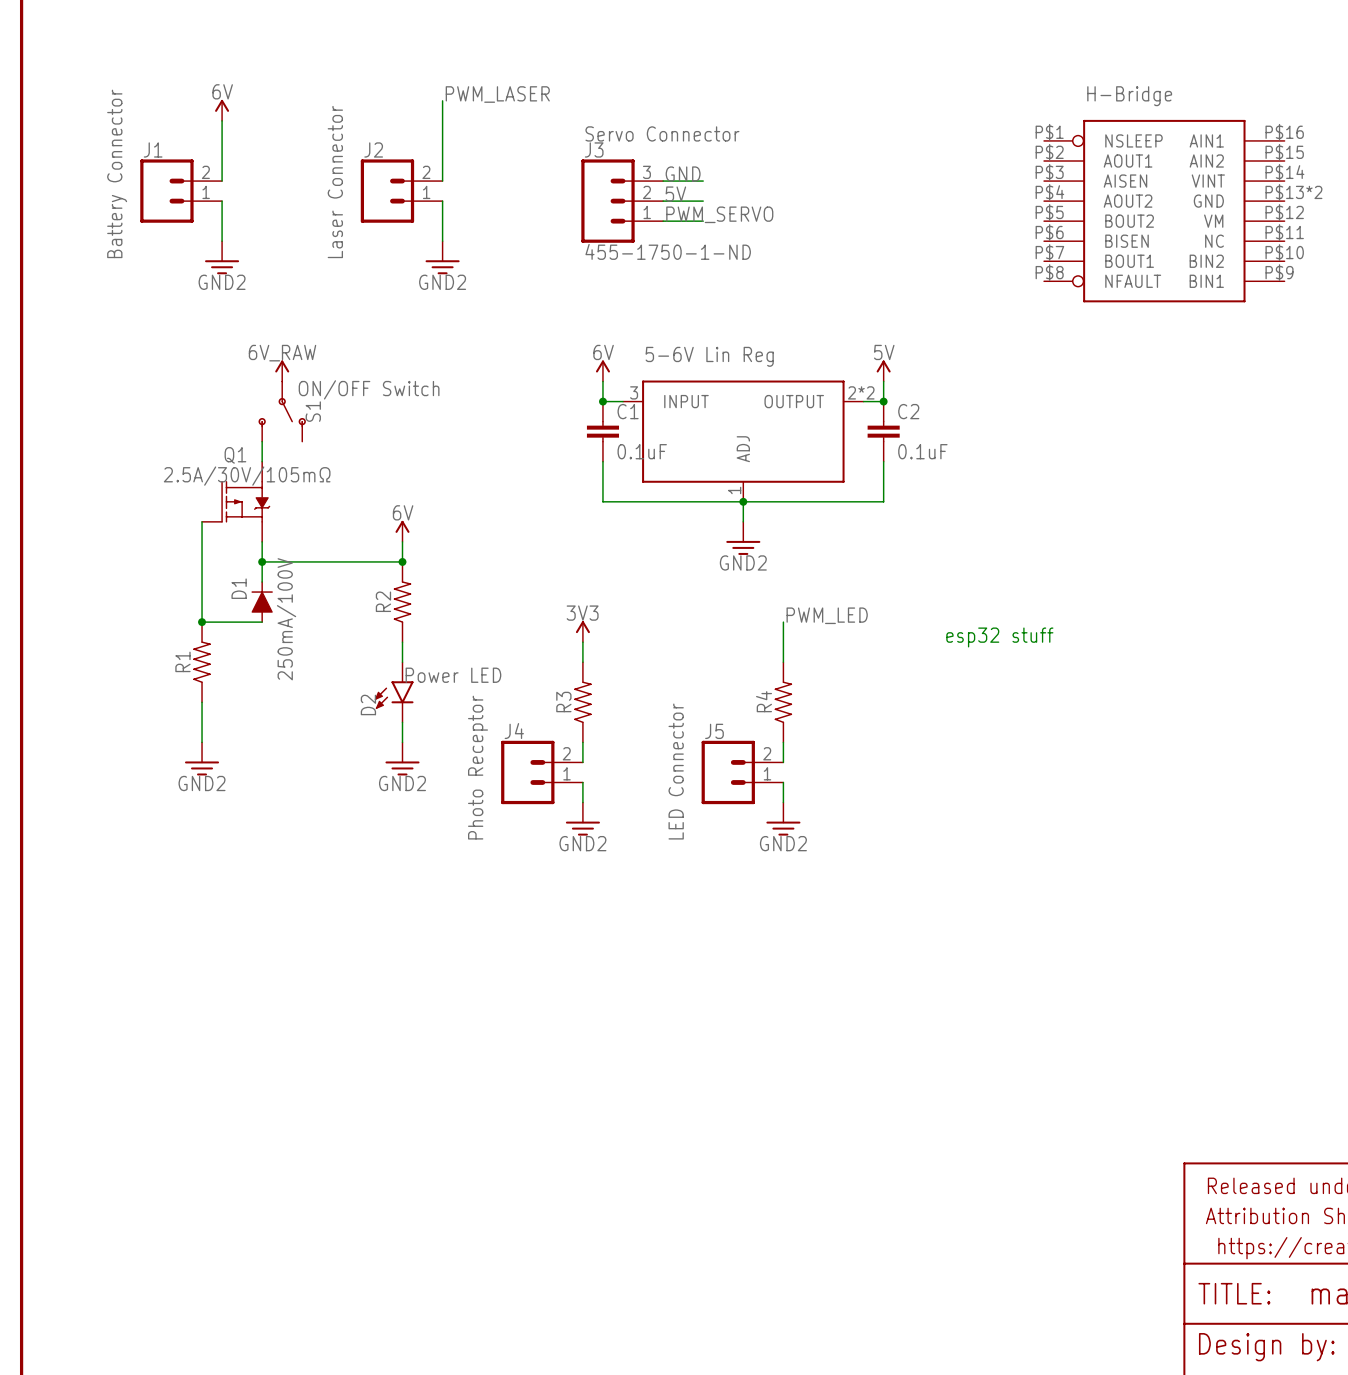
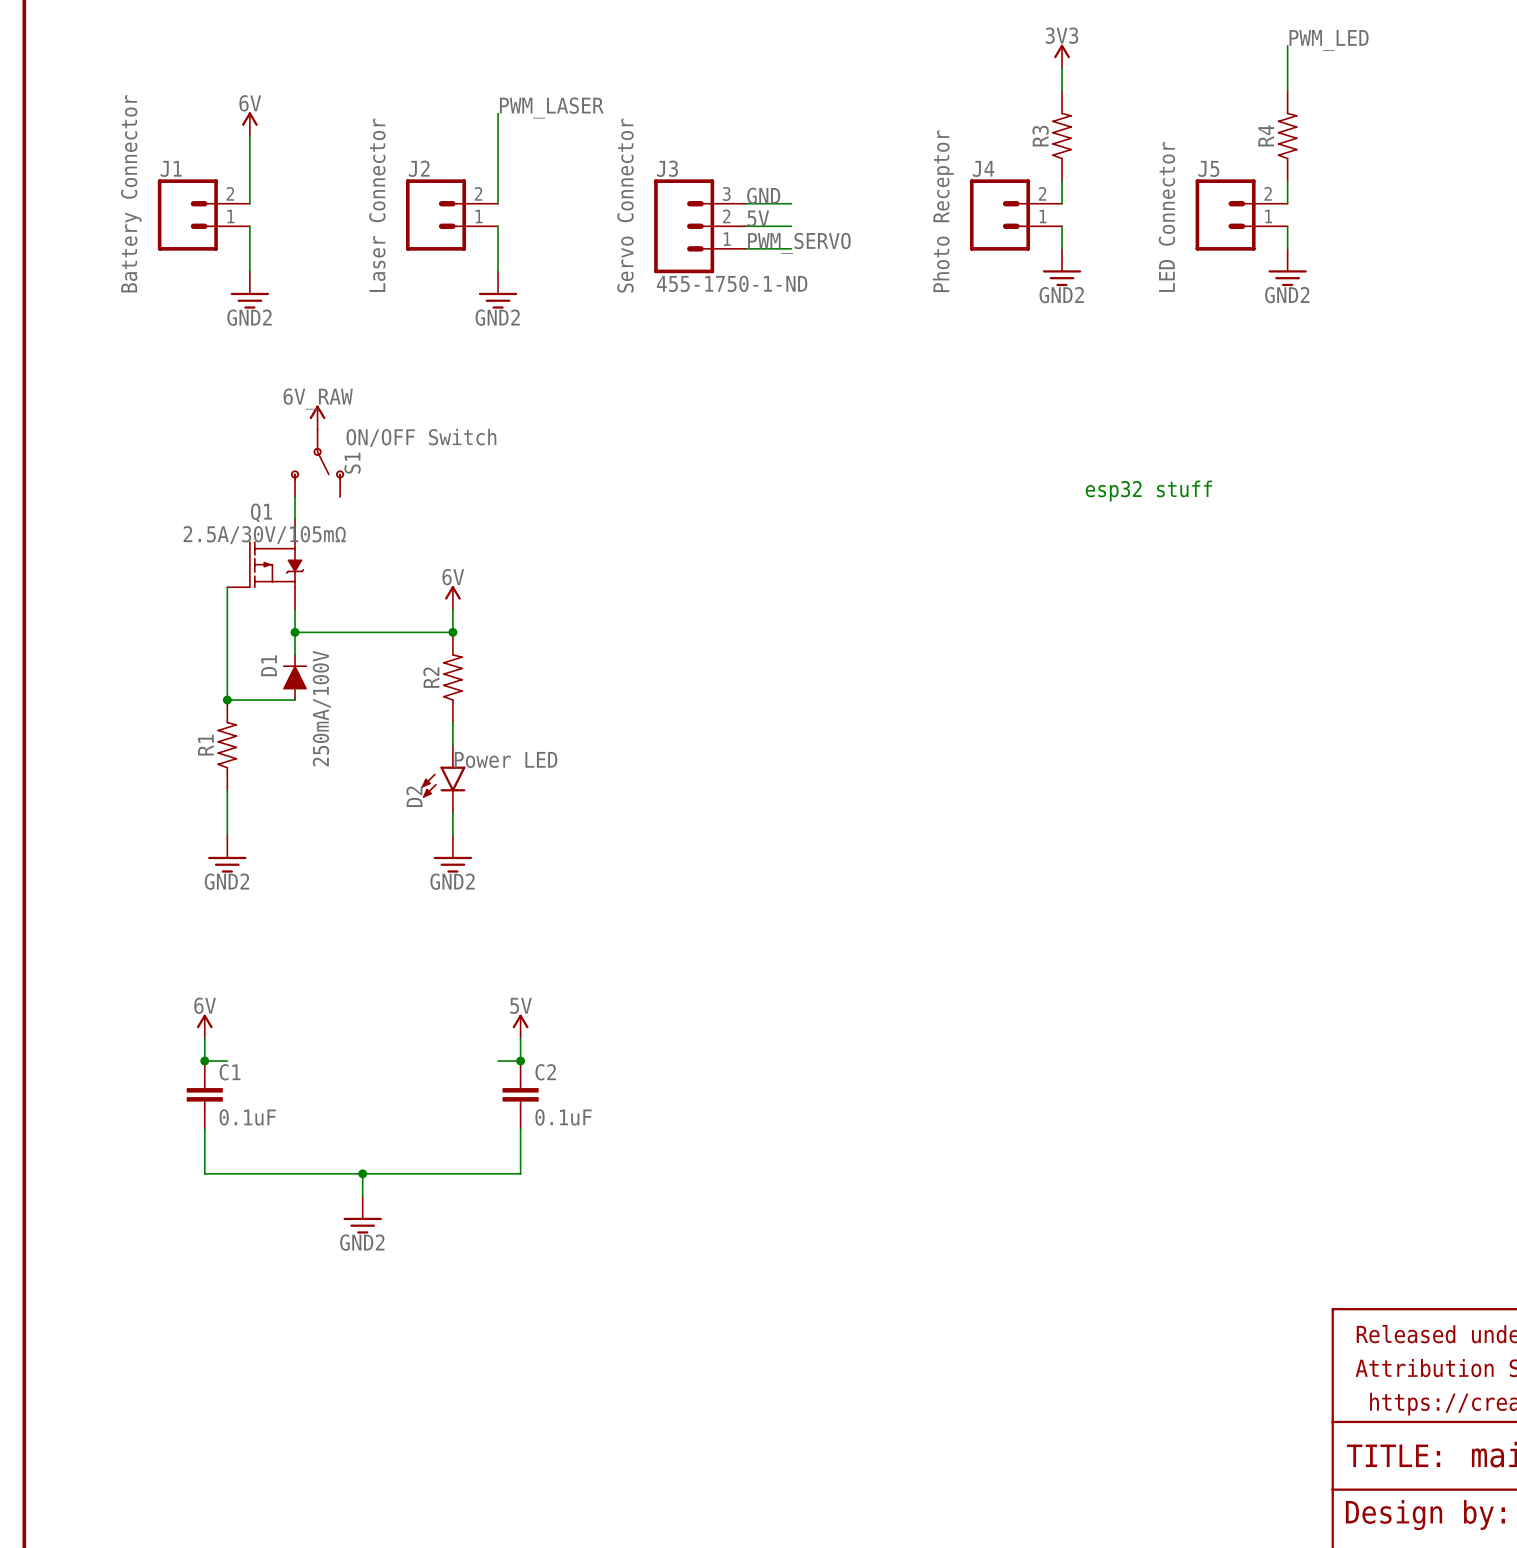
label: none -> PWM_LED (1329, 40)
wire: none -> (1287, 45) (1287, 90)
power symbol: none -> 3V3 (1062, 56)
wire: none -> (1062, 68) (1062, 90)
J3 text rotation: 0° (662, 133) -> 90° counterclockwise (625, 205)
wire: none -> (1062, 181) (1062, 203)
wire: none -> (1287, 181) (1287, 203)
wire: none -> (1062, 226) (1062, 248)
wire: none -> (1287, 226) (1287, 248)
part: (1164, 211) -> none
power symbol: none -> GND2 (1062, 267)
power symbol: none -> GND2 (1287, 267)
power symbol: 6V (602, 371) -> none
power symbol: 5V (883, 371) -> none
wire: (602, 381) (602, 401) (623, 401) -> none
wire: (883, 381) (883, 401) (863, 401) -> none
junction: (602, 401) -> none
junction: (883, 401) -> none
C1 position: (602, 431) -> (204, 1094)
C2 position: (883, 431) -> (520, 1094)
text: none -> esp32 stuff (1148, 491)
part: (743, 441) -> none
wire: (602, 461) (602, 501) (883, 501) (883, 461) -> none
wire: (743, 501) (743, 521) -> none
junction: (743, 501) -> none
power symbol: GND2 (743, 538) -> none
label: PWM_LED (827, 615) -> none
wire: (783, 622) (783, 662) -> none
power symbol: 3V3 (582, 631) -> none
text: esp32 stuff (999, 637) -> none
wire: (582, 642) (582, 662) -> none
R3 position: (582, 702) -> (1062, 136)
R4 position: (783, 702) -> (1287, 136)
wire: (582, 742) (582, 762) -> none
wire: (783, 742) (783, 762) -> none
J4 position: (542, 772) -> (1016, 215)
J5 position: (742, 772) -> (1241, 215)
wire: (582, 782) (582, 802) -> none
wire: (783, 782) (783, 802) -> none
power symbol: GND2 (582, 819) -> none
power symbol: GND2 (783, 819) -> none
power symbol: none -> 6V (204, 1026)
power symbol: none -> 5V (520, 1026)
wire: none -> (204, 1038) (204, 1061) (227, 1061)
wire: none -> (520, 1038) (520, 1061) (498, 1061)
junction: none -> (204, 1061)
junction: none -> (520, 1061)
wire: none -> (204, 1128) (204, 1173) (520, 1173) (520, 1128)
wire: none -> (362, 1173) (362, 1196)
junction: none -> (362, 1173)
power symbol: none -> GND2 (362, 1214)

